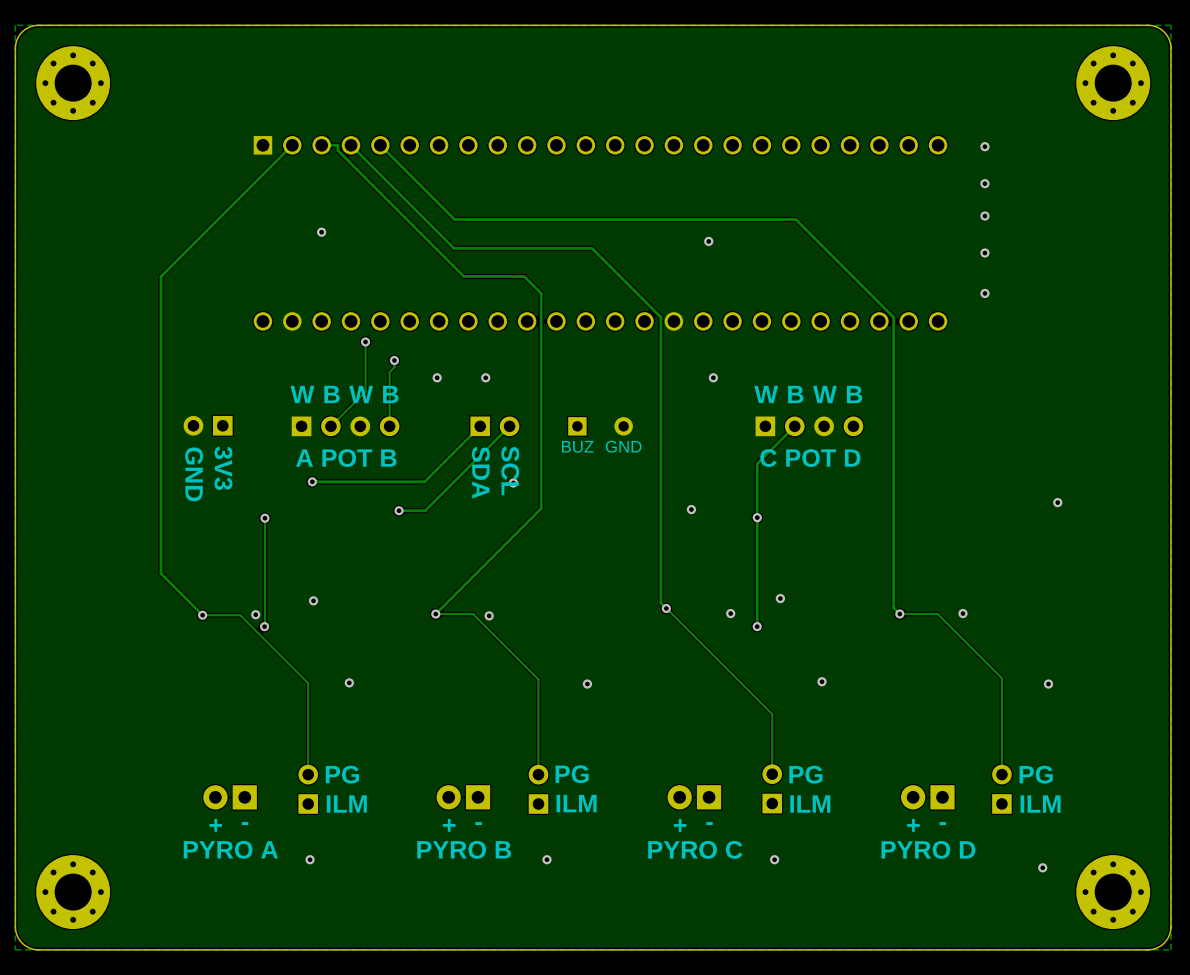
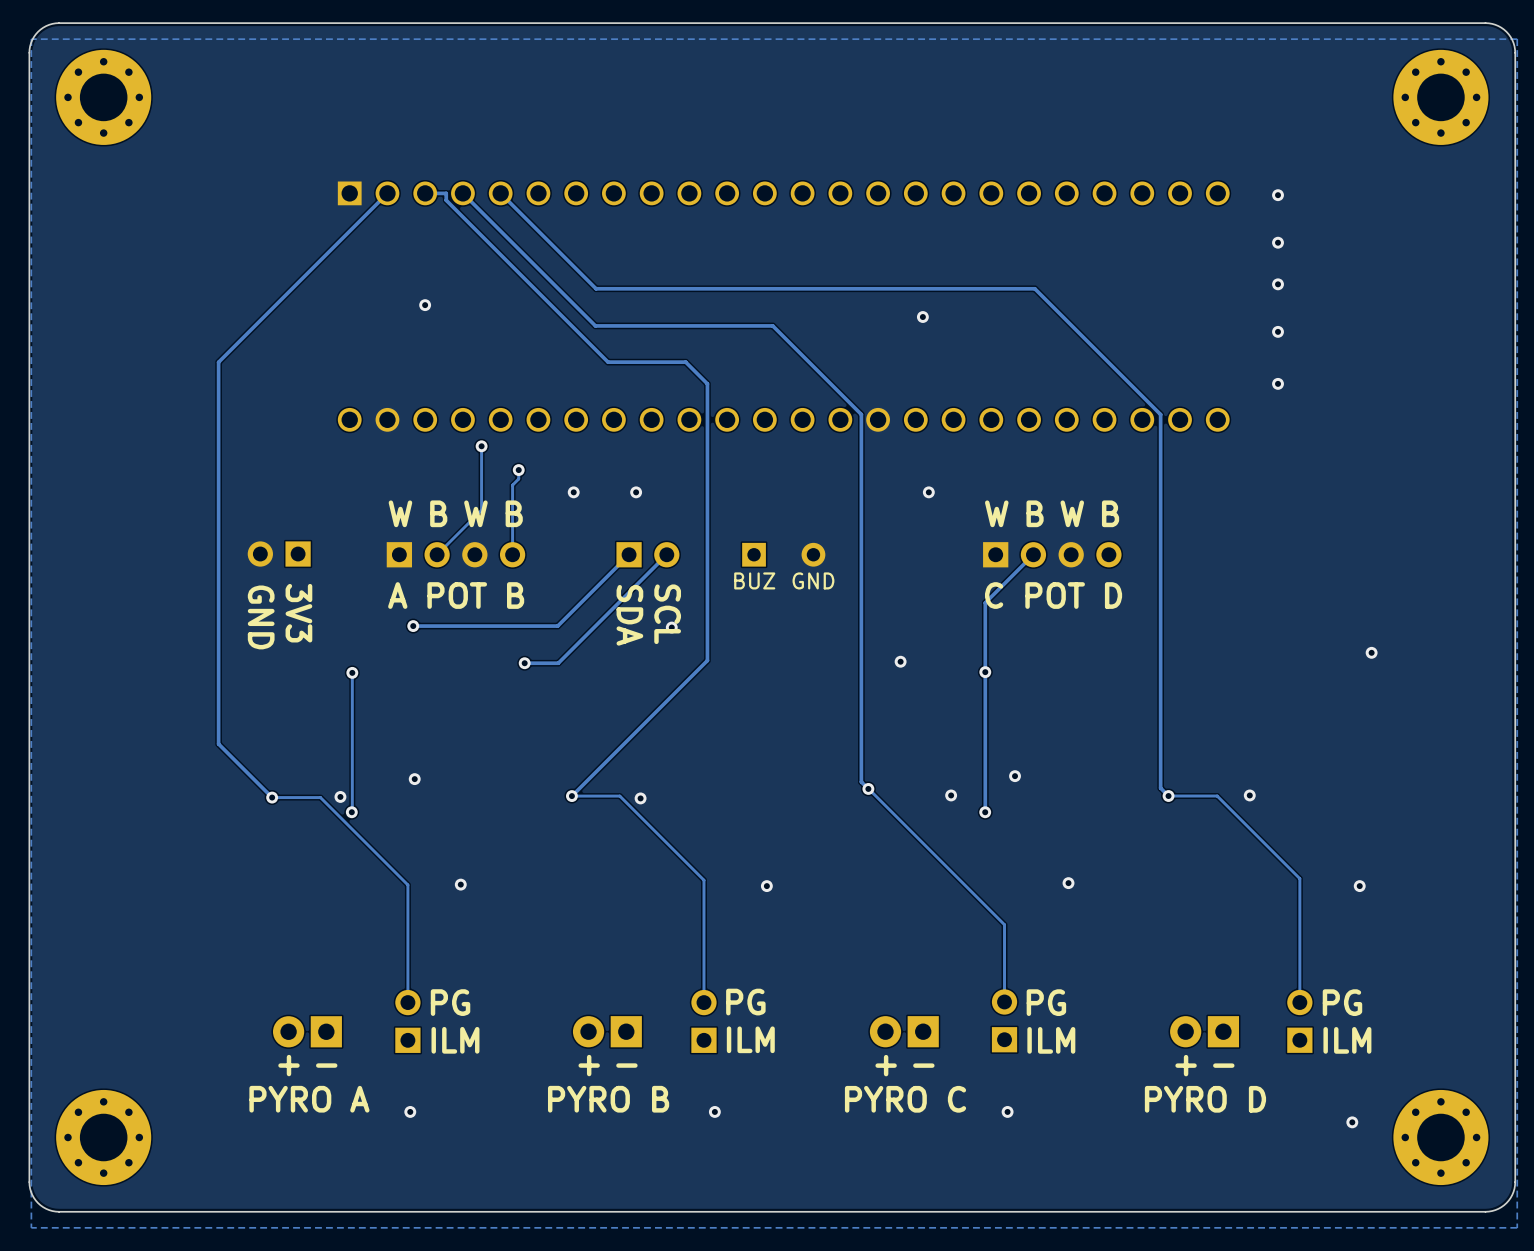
board edge: (1147, 25) (38, 25) (24, 30) (17, 38) (15, 48) (15, 926) (20, 941) (28, 947) (38, 949) (1147, 949) (1162, 944) (1168, 936) (1171, 926) (1171, 48) (1168, 38) (1164, 32) (1157, 27) (1147, 25) -> (1485, 23) (59, 23) (49, 24) (40, 29) (32, 39) (29, 52) (29, 1182) (31, 1191) (35, 1200) (46, 1208) (59, 1211) (1485, 1211) (1495, 1210) (1504, 1205) (1512, 1194) (1515, 1182) (1515, 52) (1513, 43) (1506, 31) (1495, 24) (1485, 23)
part position: (73, 83) -> (103, 97)
part position: (1113, 83) -> (1440, 97)
part position: (73, 892) -> (103, 1137)
part position: (1113, 892) -> (1440, 1137)

